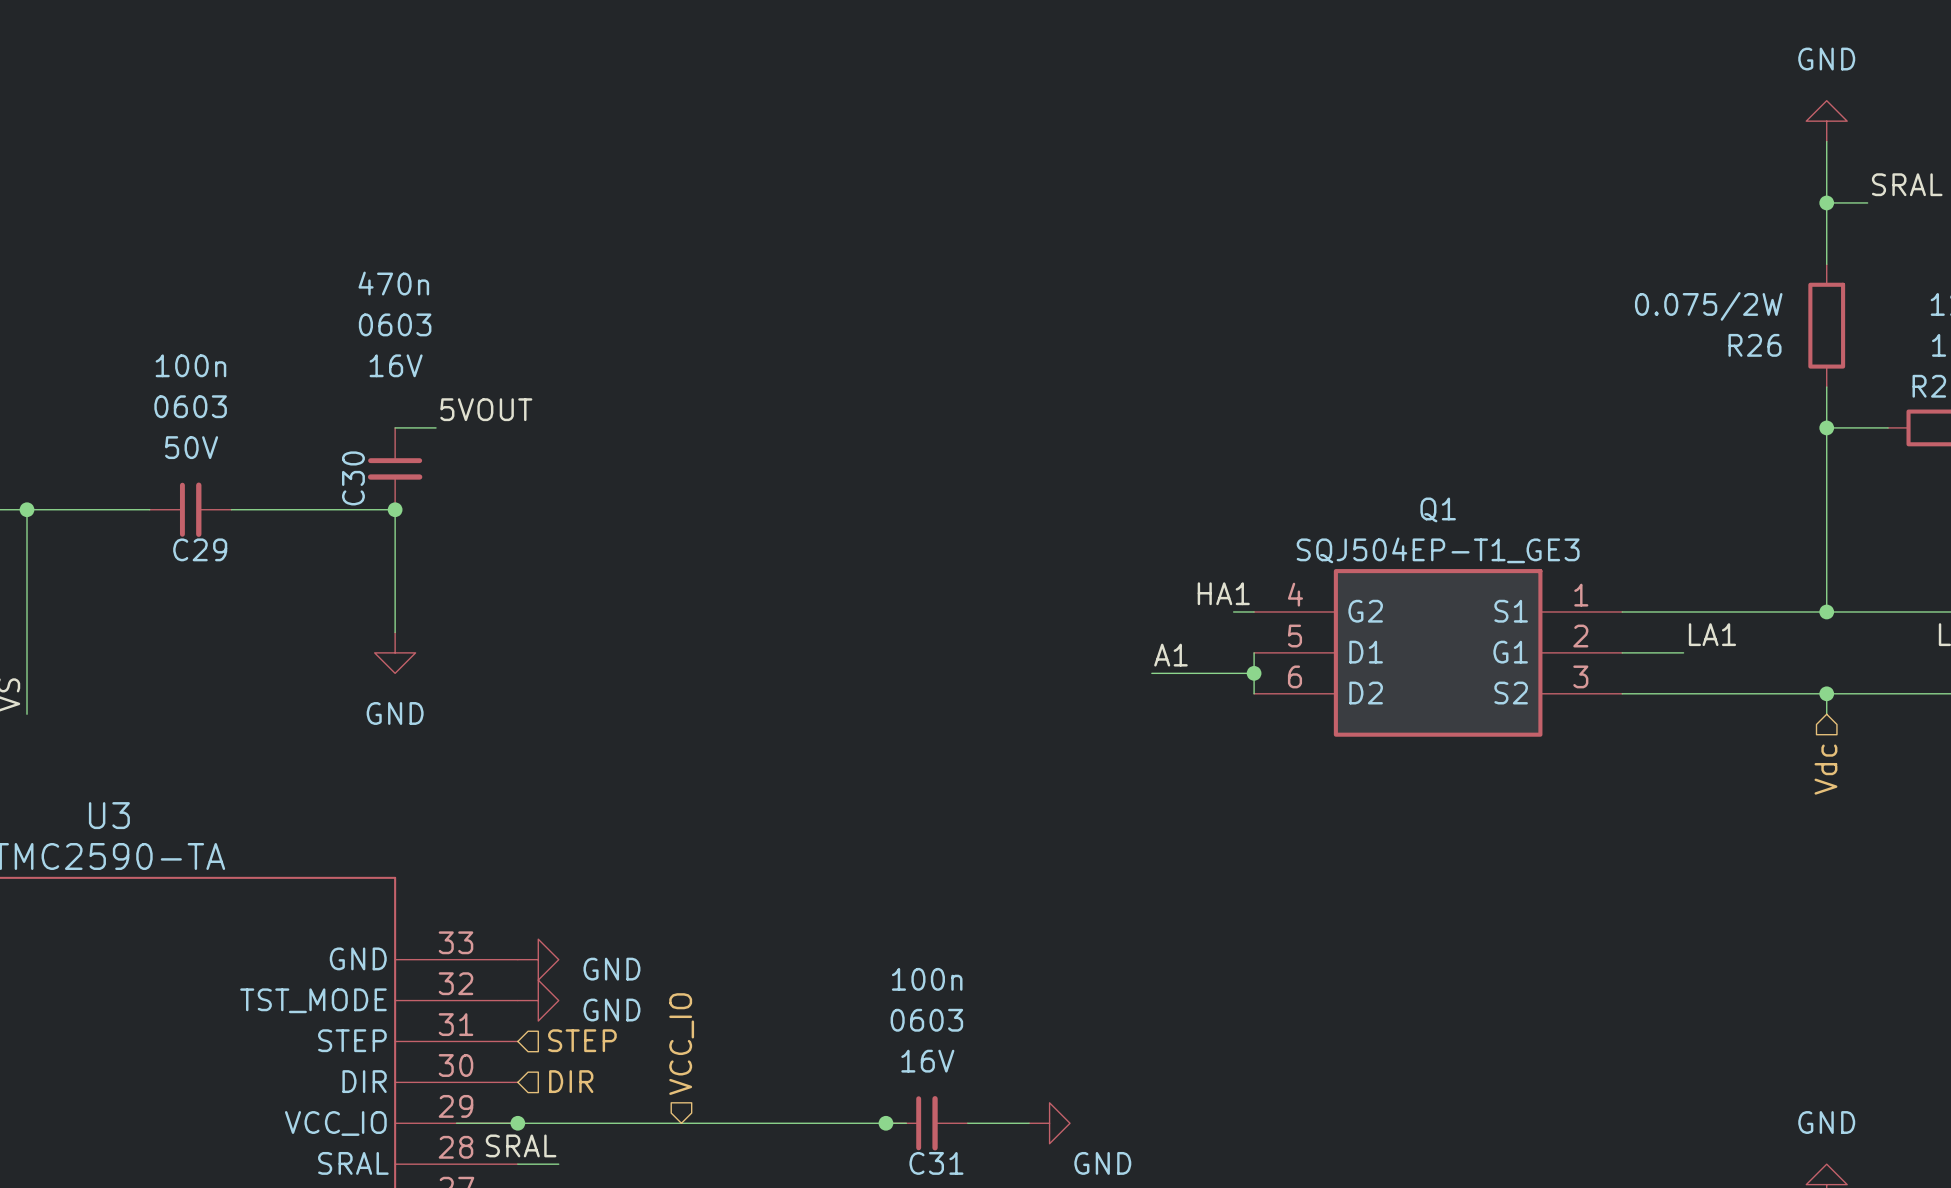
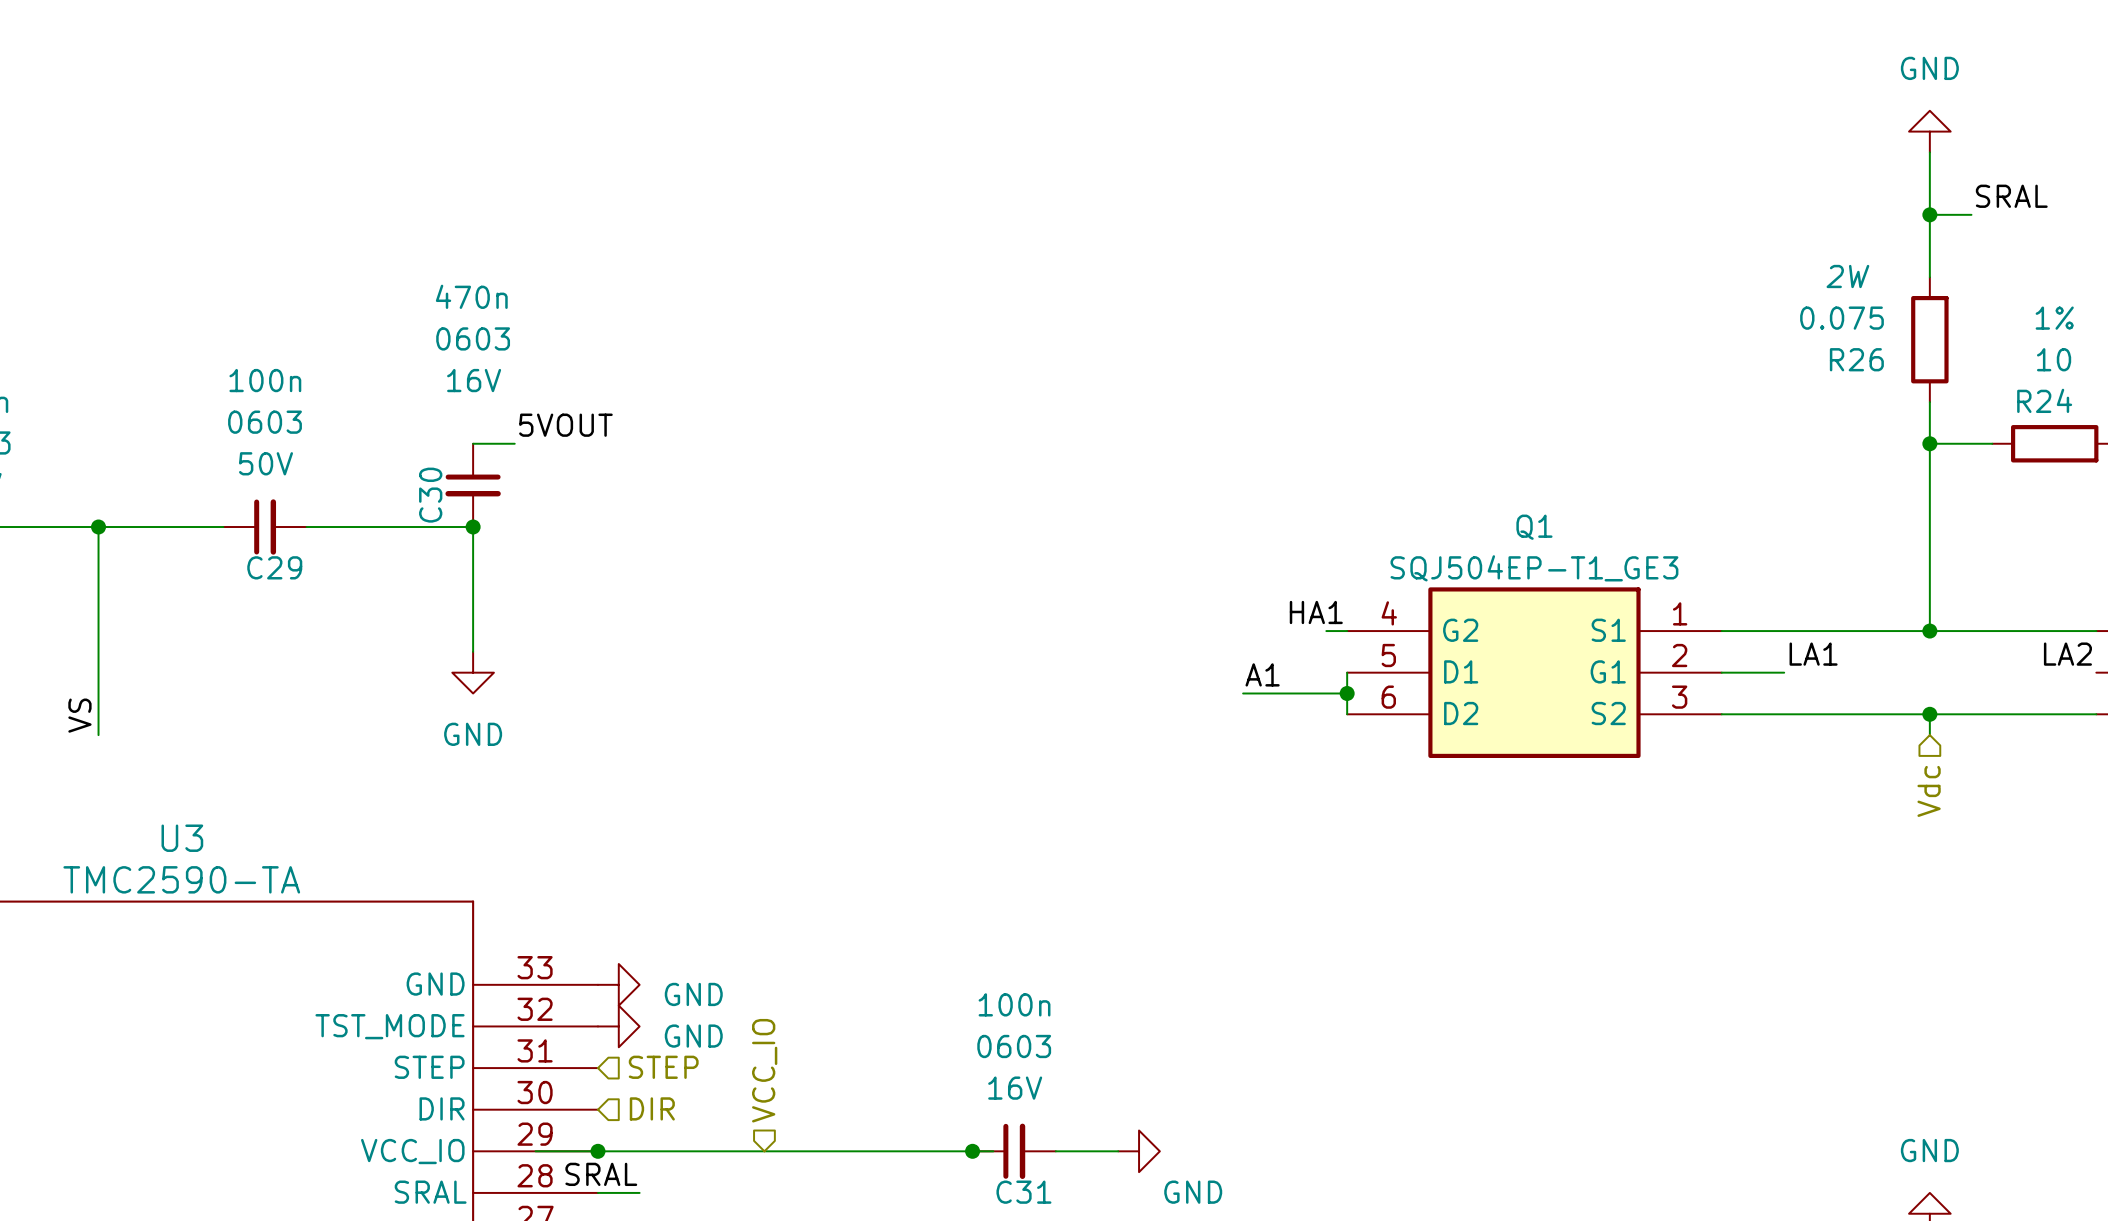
R26 text: none -> 2W (1847, 276)
R26 value: 0.075/2W (1708, 306) -> 0.075 (1842, 318)

